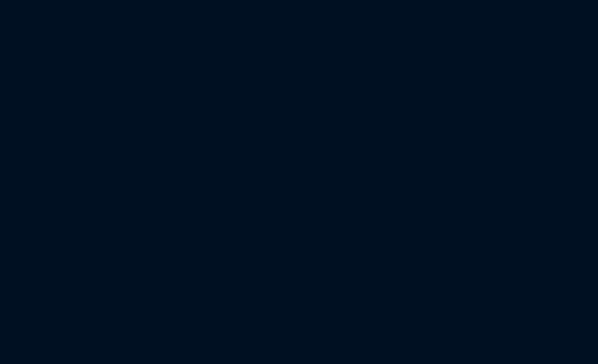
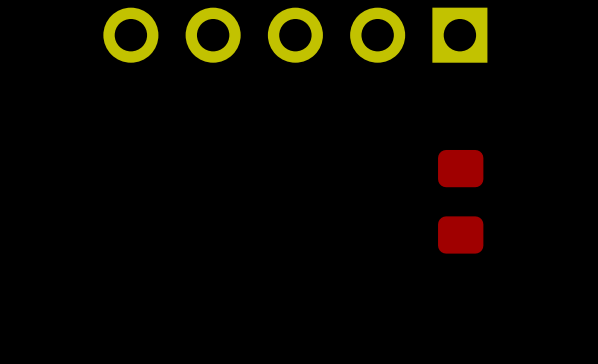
part: none -> (295, 35)
part: none -> (460, 201)

